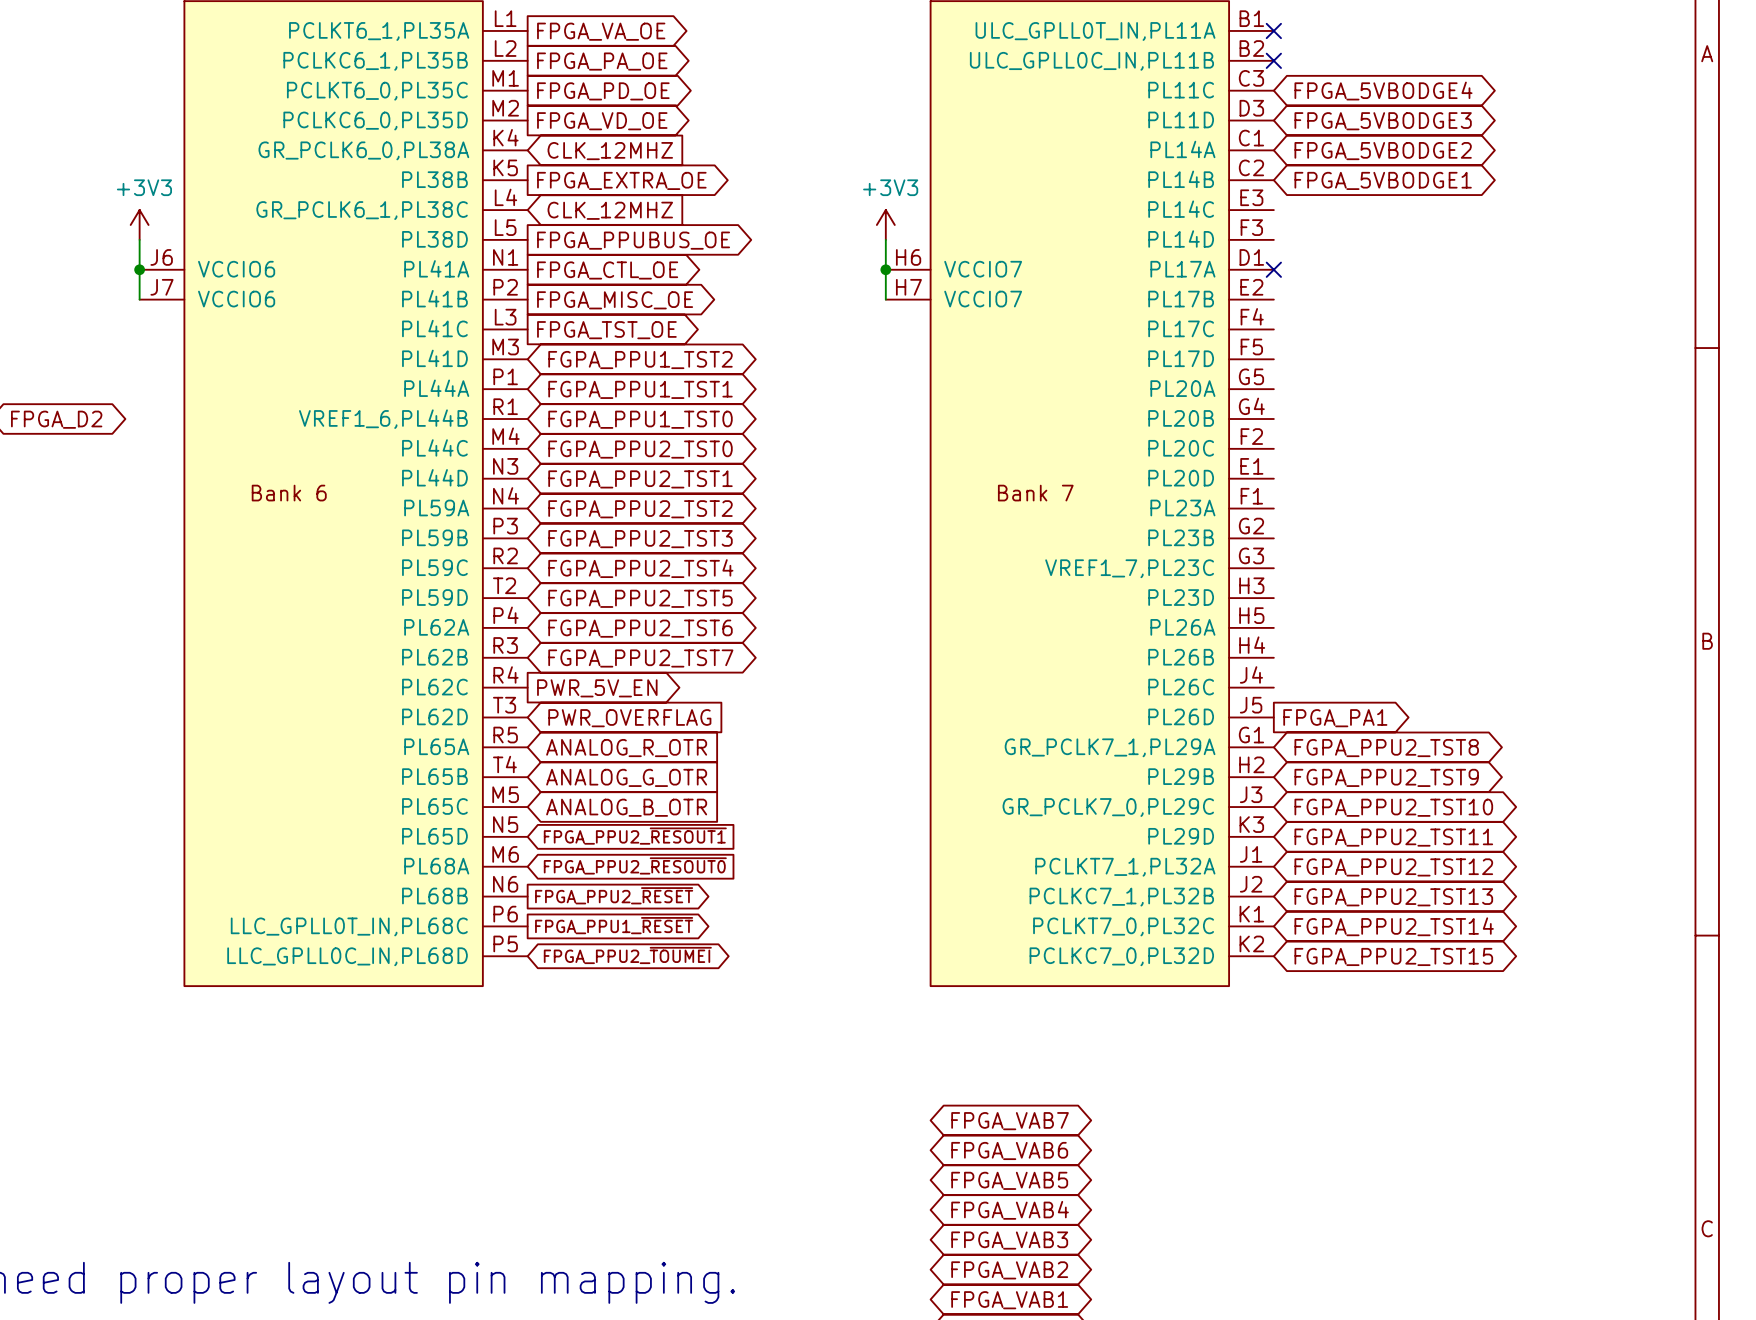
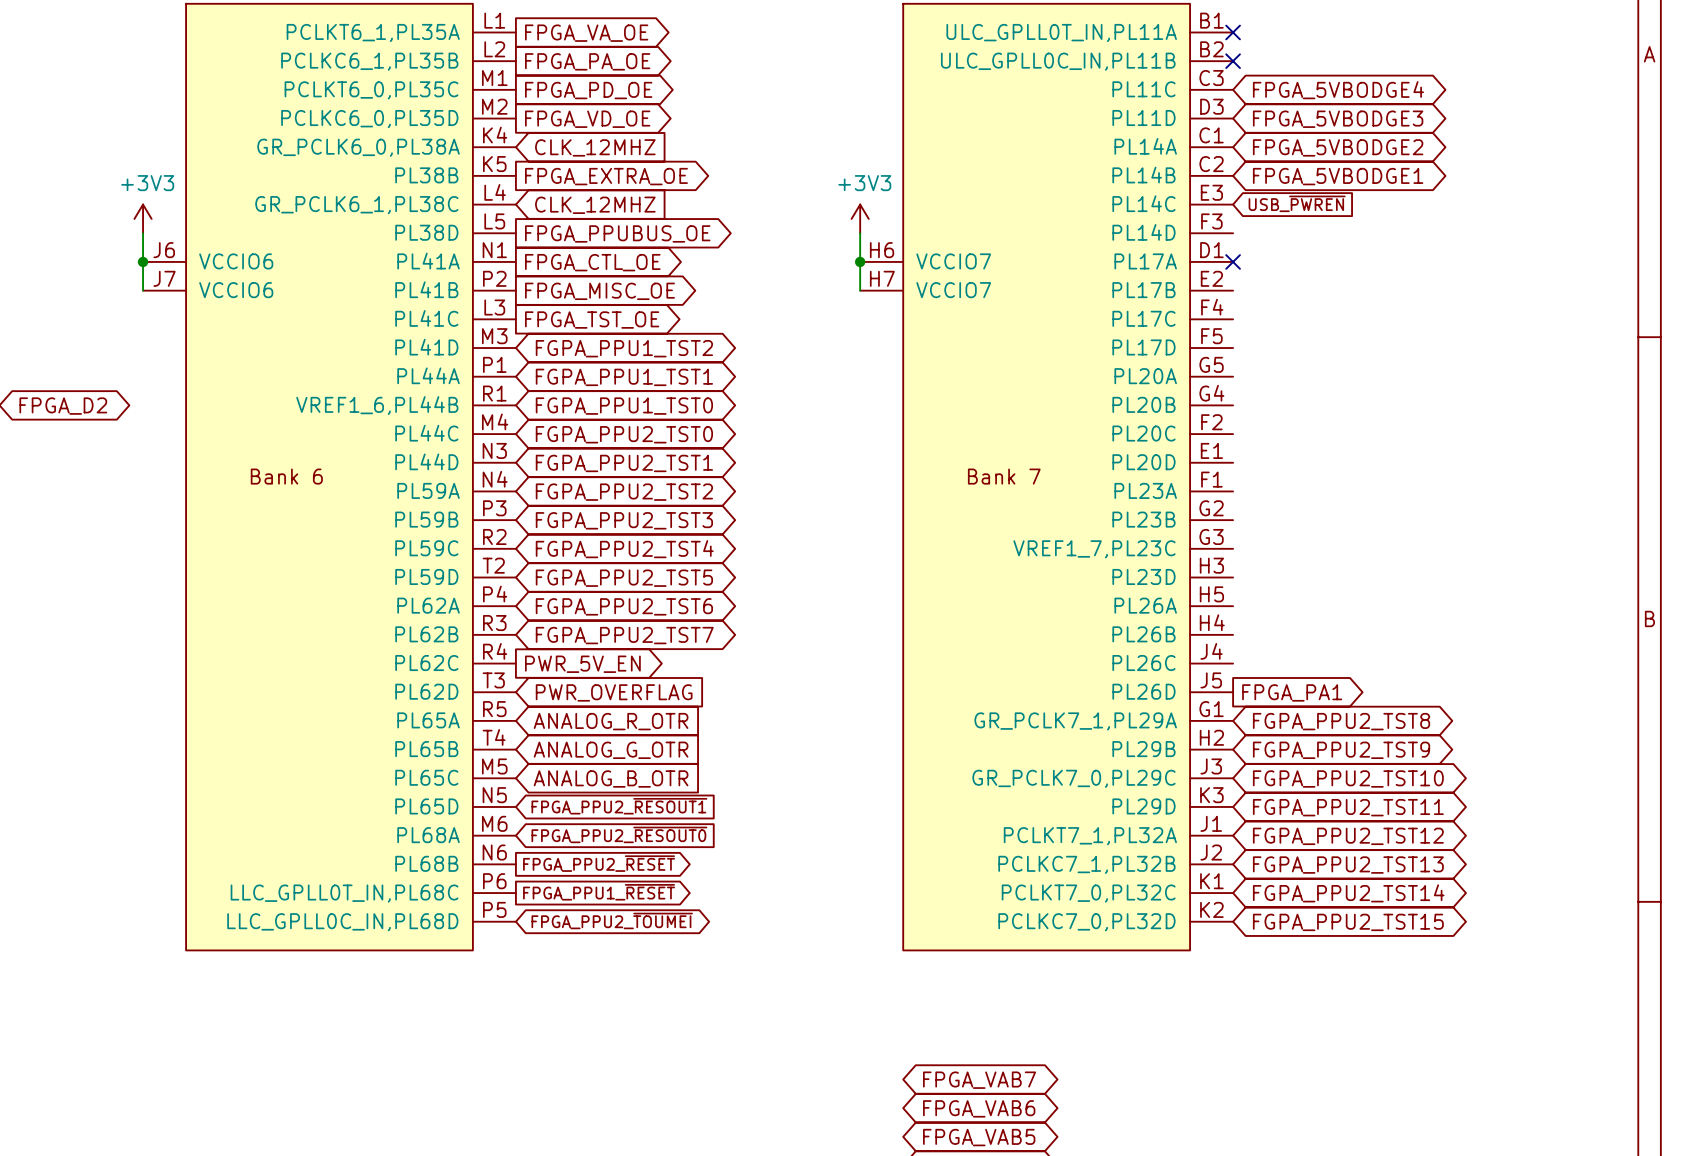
global label: none -> USB_~{PWREN} (1297, 203)

